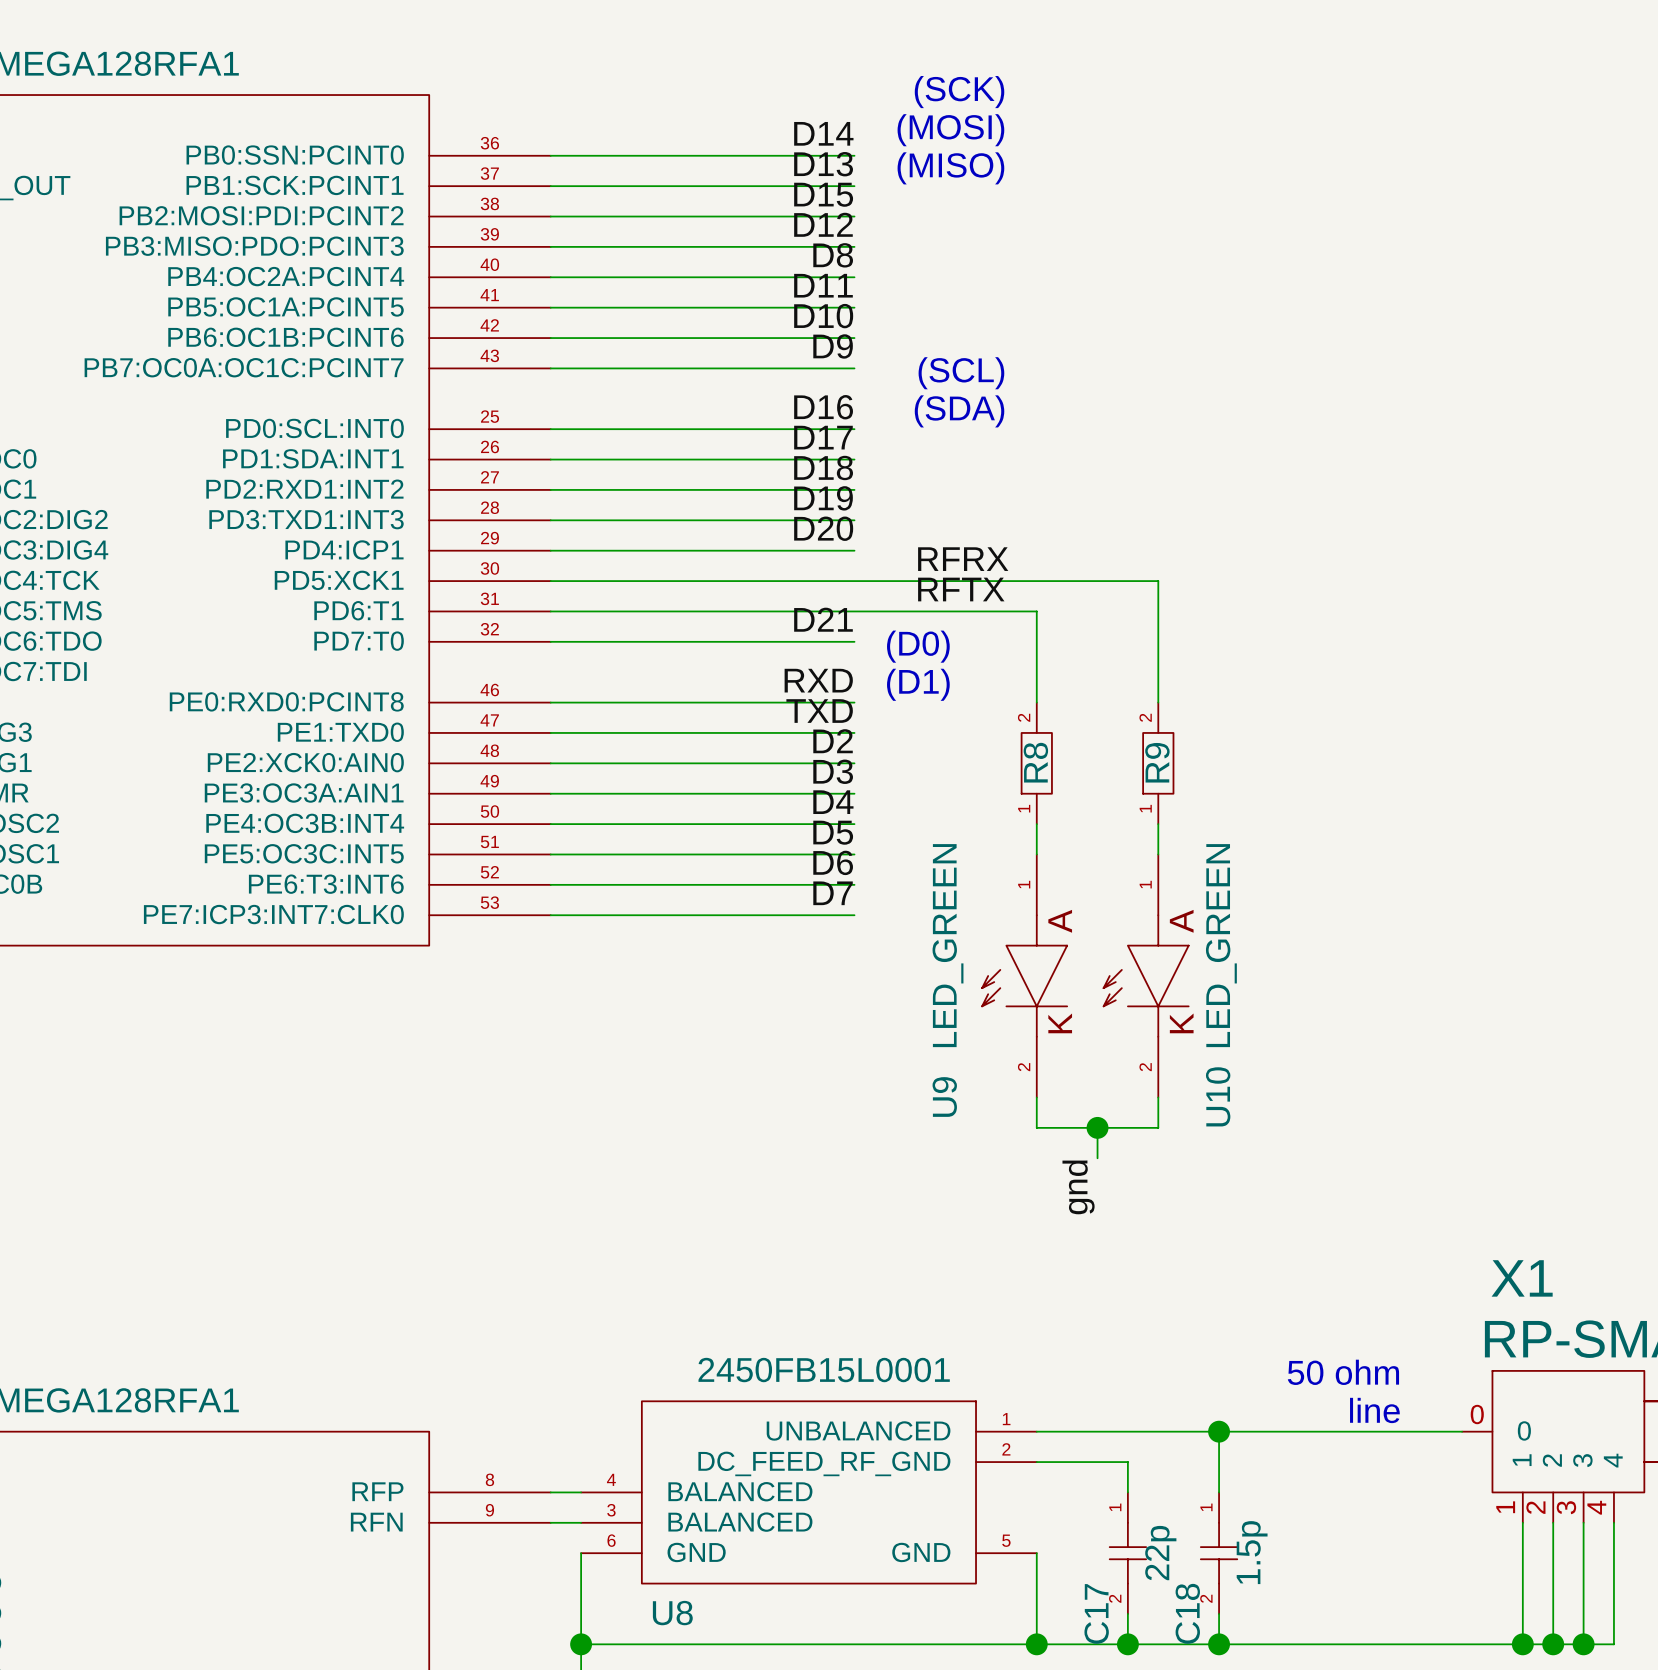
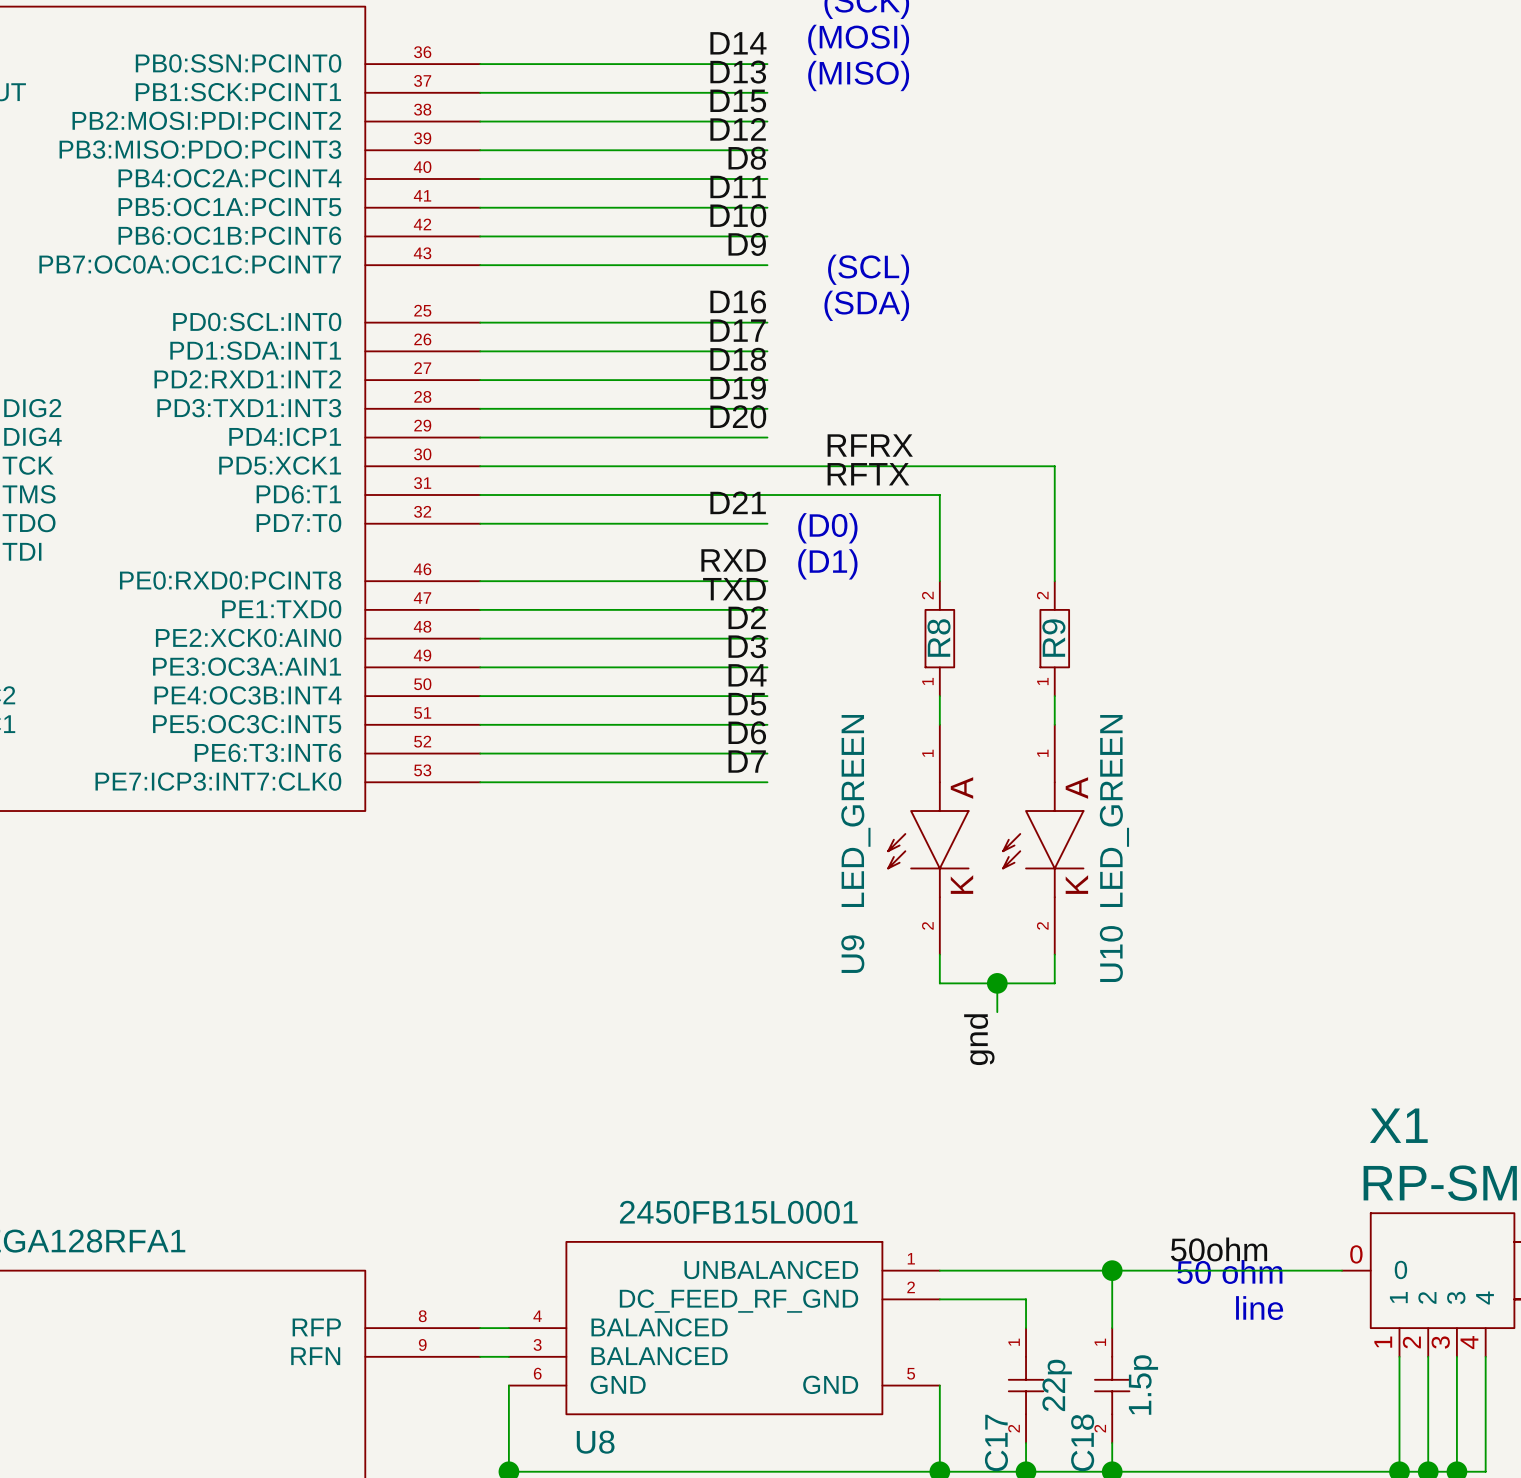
text position: 50 ohm (1343, 1372) -> 50 ohm (1229, 1271)
label: none -> 50ohm (1219, 1249)
text position: line (1374, 1410) -> line (1259, 1308)

